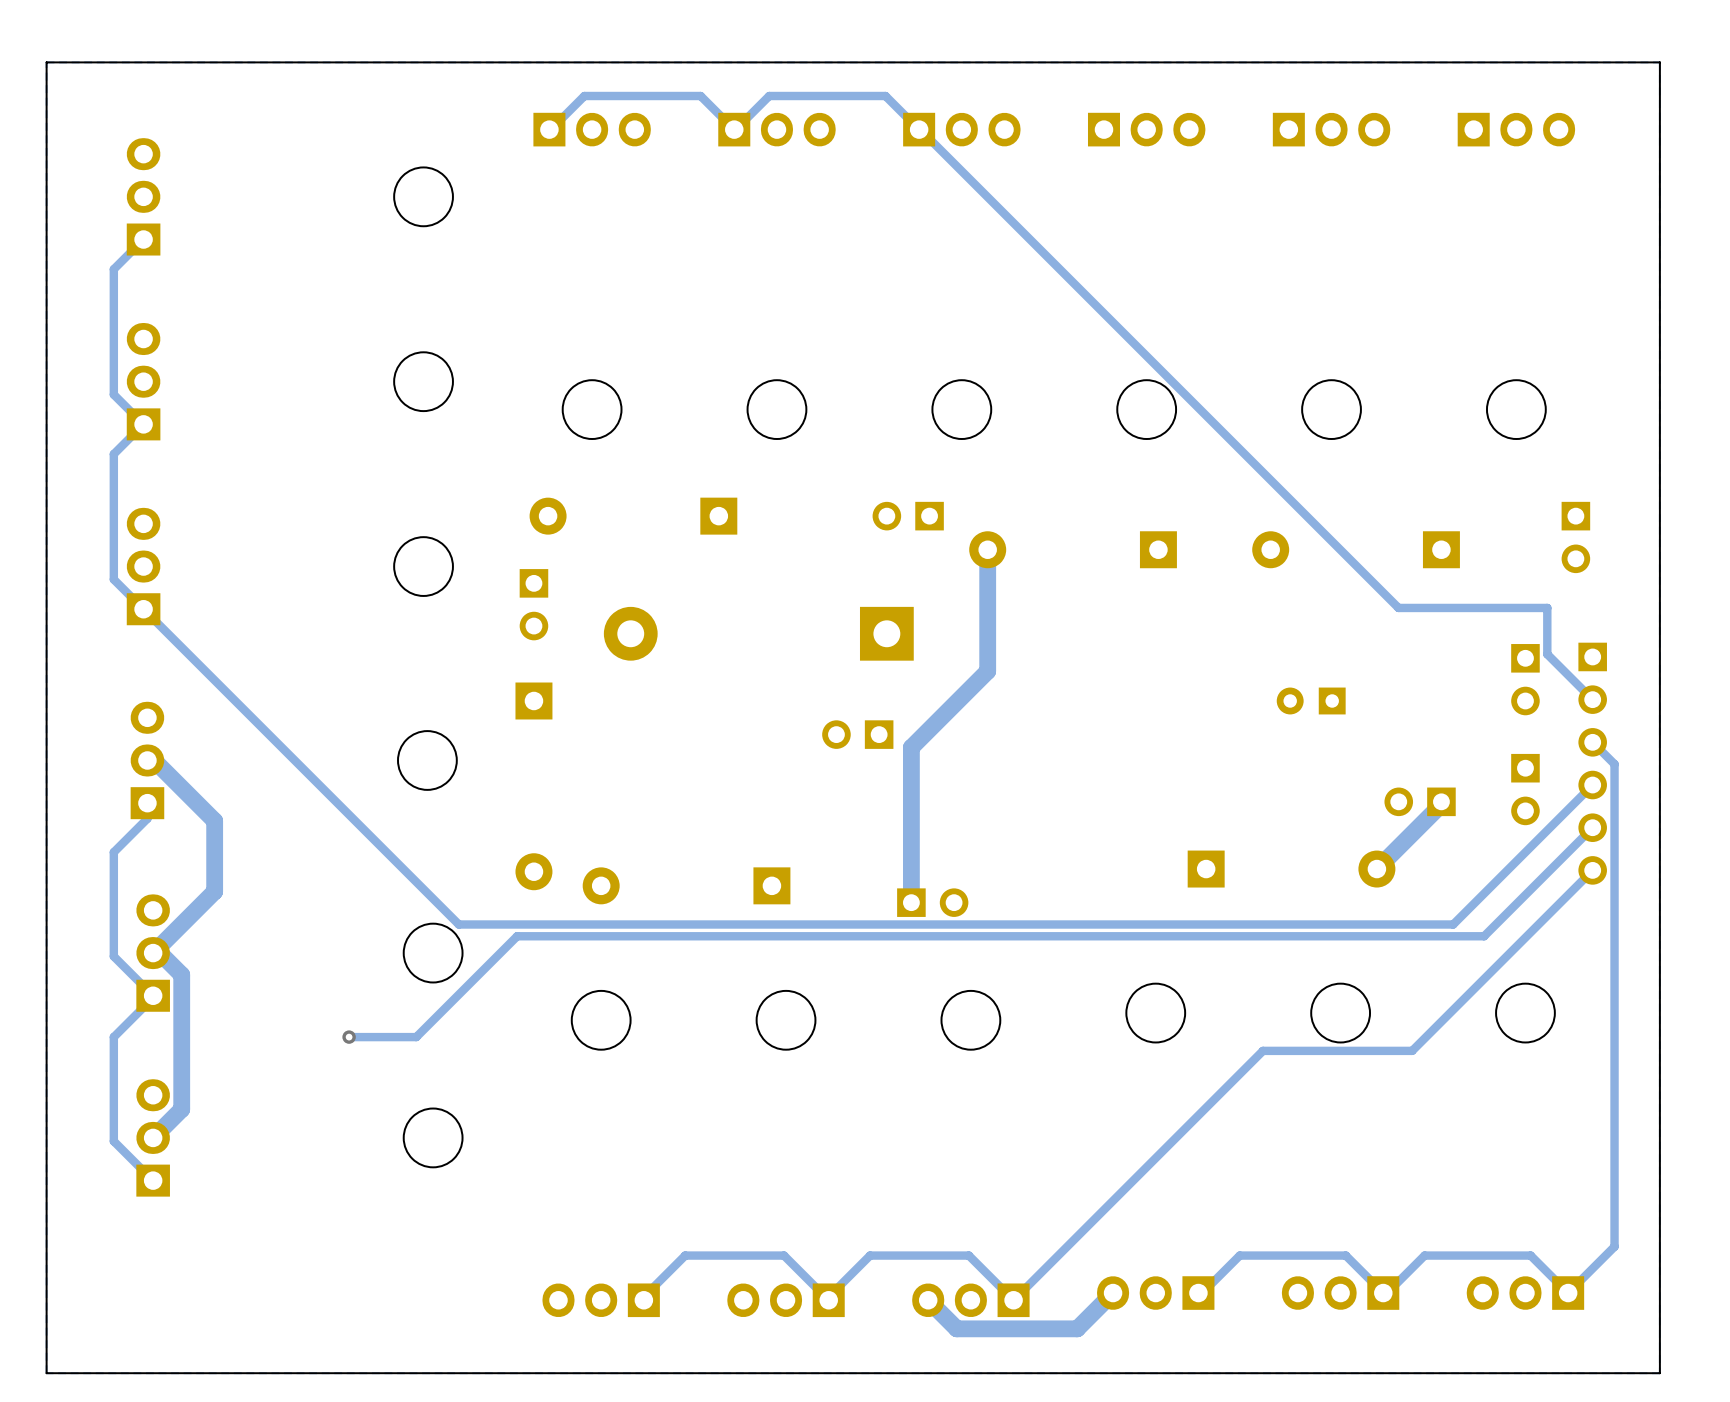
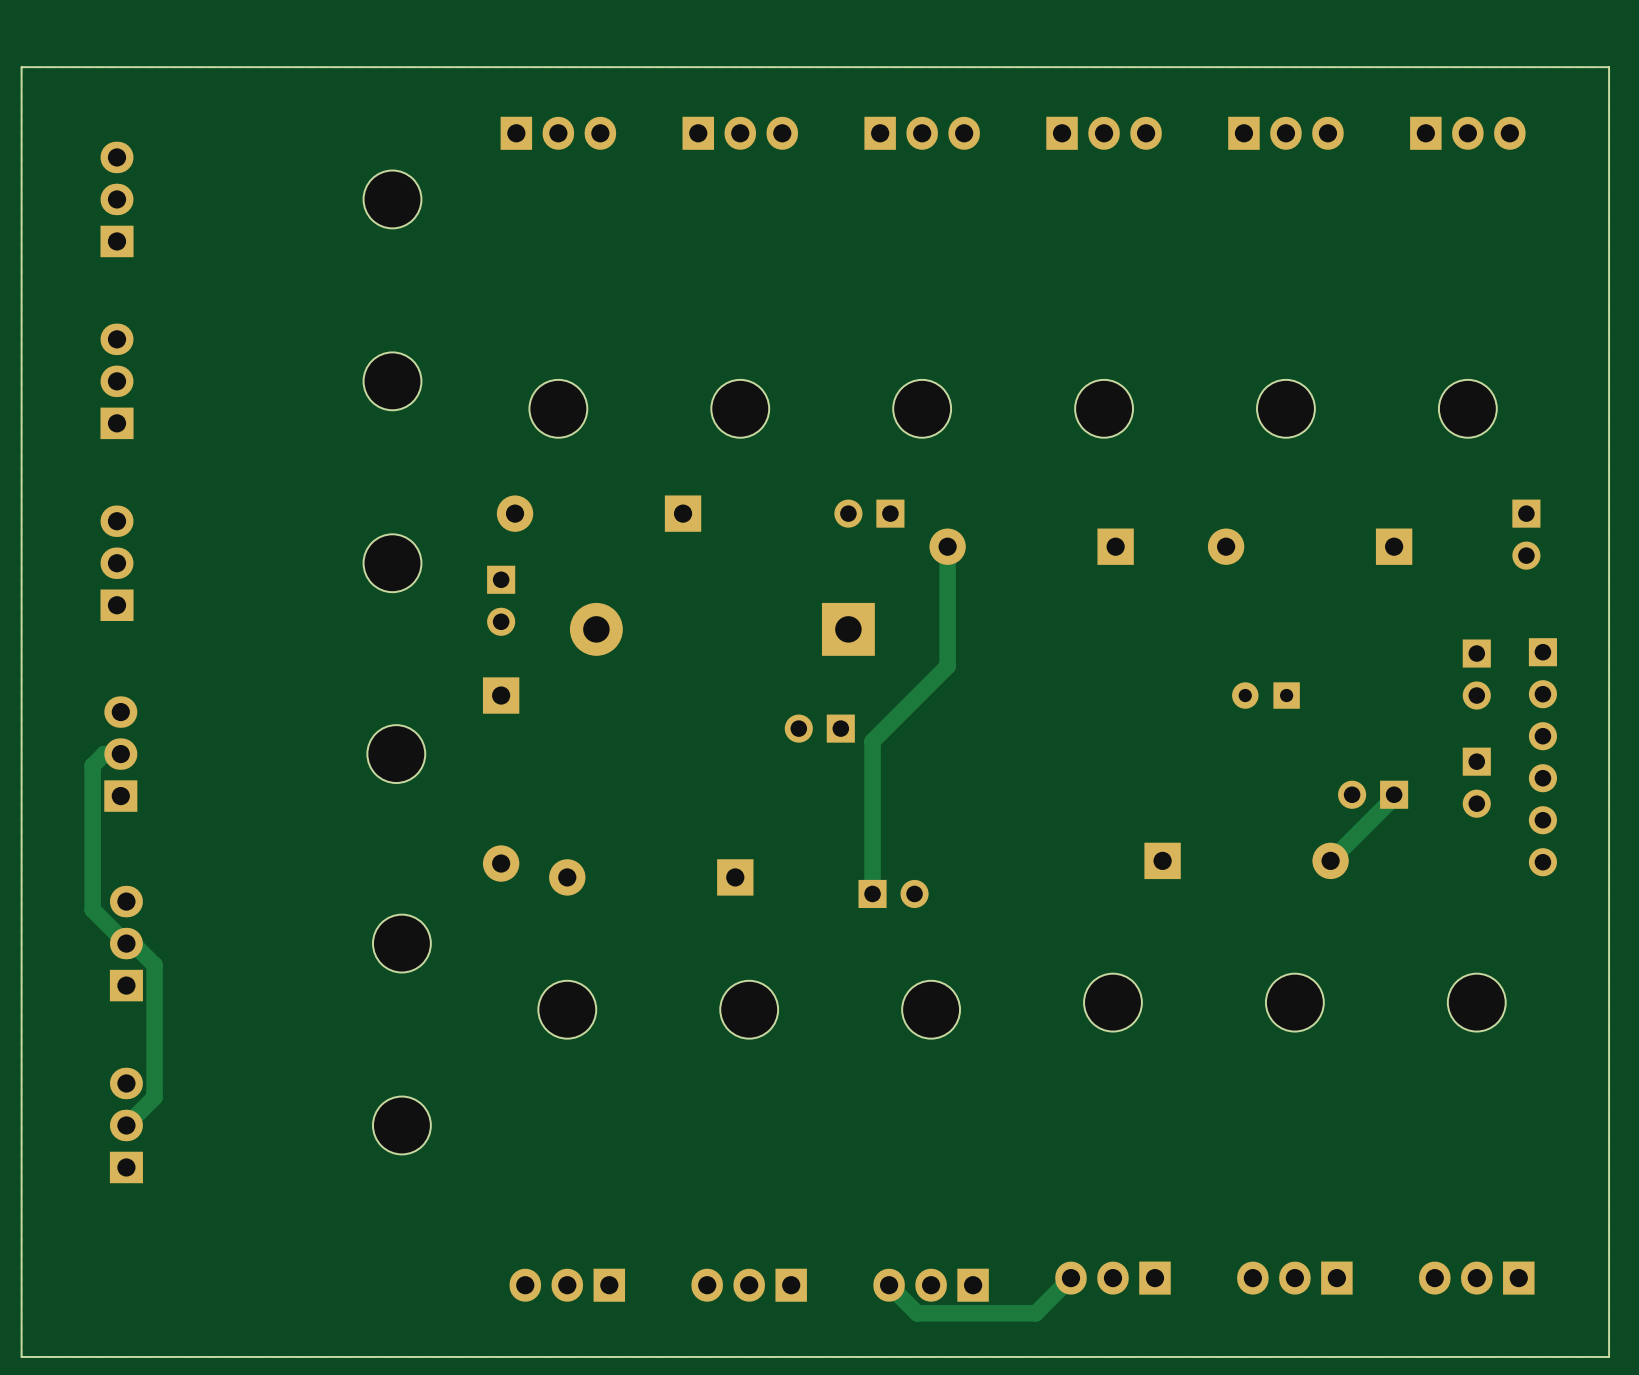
track: (549, 129) (584, 96) (700, 96) (734, 129) (769, 96) (885, 96) (1398, 607) (1547, 607) (1547, 654) (1592, 699) -> none
track: (143, 239) (113, 269) (113, 394) (143, 424) (113, 454) (113, 579) (458, 924) (1453, 924) (1592, 785) -> none
track: (1592, 742) (1614, 764) (1614, 1246) (1568, 1293) (1530, 1255) (1424, 1255) (1387, 1293) (1383, 1293) (1345, 1255) (1239, 1255) (1202, 1293) (1198, 1293) -> none
track: (147, 760) (154, 760) (214, 820) (214, 891) (153, 953) -> (120, 754) (104, 754) (92, 765) (92, 909) (126, 943)
track: (147, 803) (147, 818) (113, 852) (113, 956) (153, 995) (113, 1037) (113, 1141) (153, 1180) -> none
track: (1592, 827) (1484, 936) (517, 936) (416, 1037) (349, 1037) -> none
track: (1592, 870) (1412, 1050) (1262, 1050) (1013, 1300) (968, 1255) (870, 1255) (828, 1296) (828, 1300) (784, 1255) (685, 1255) (643, 1296) (643, 1300) -> none
via: (349, 1037) -> none

